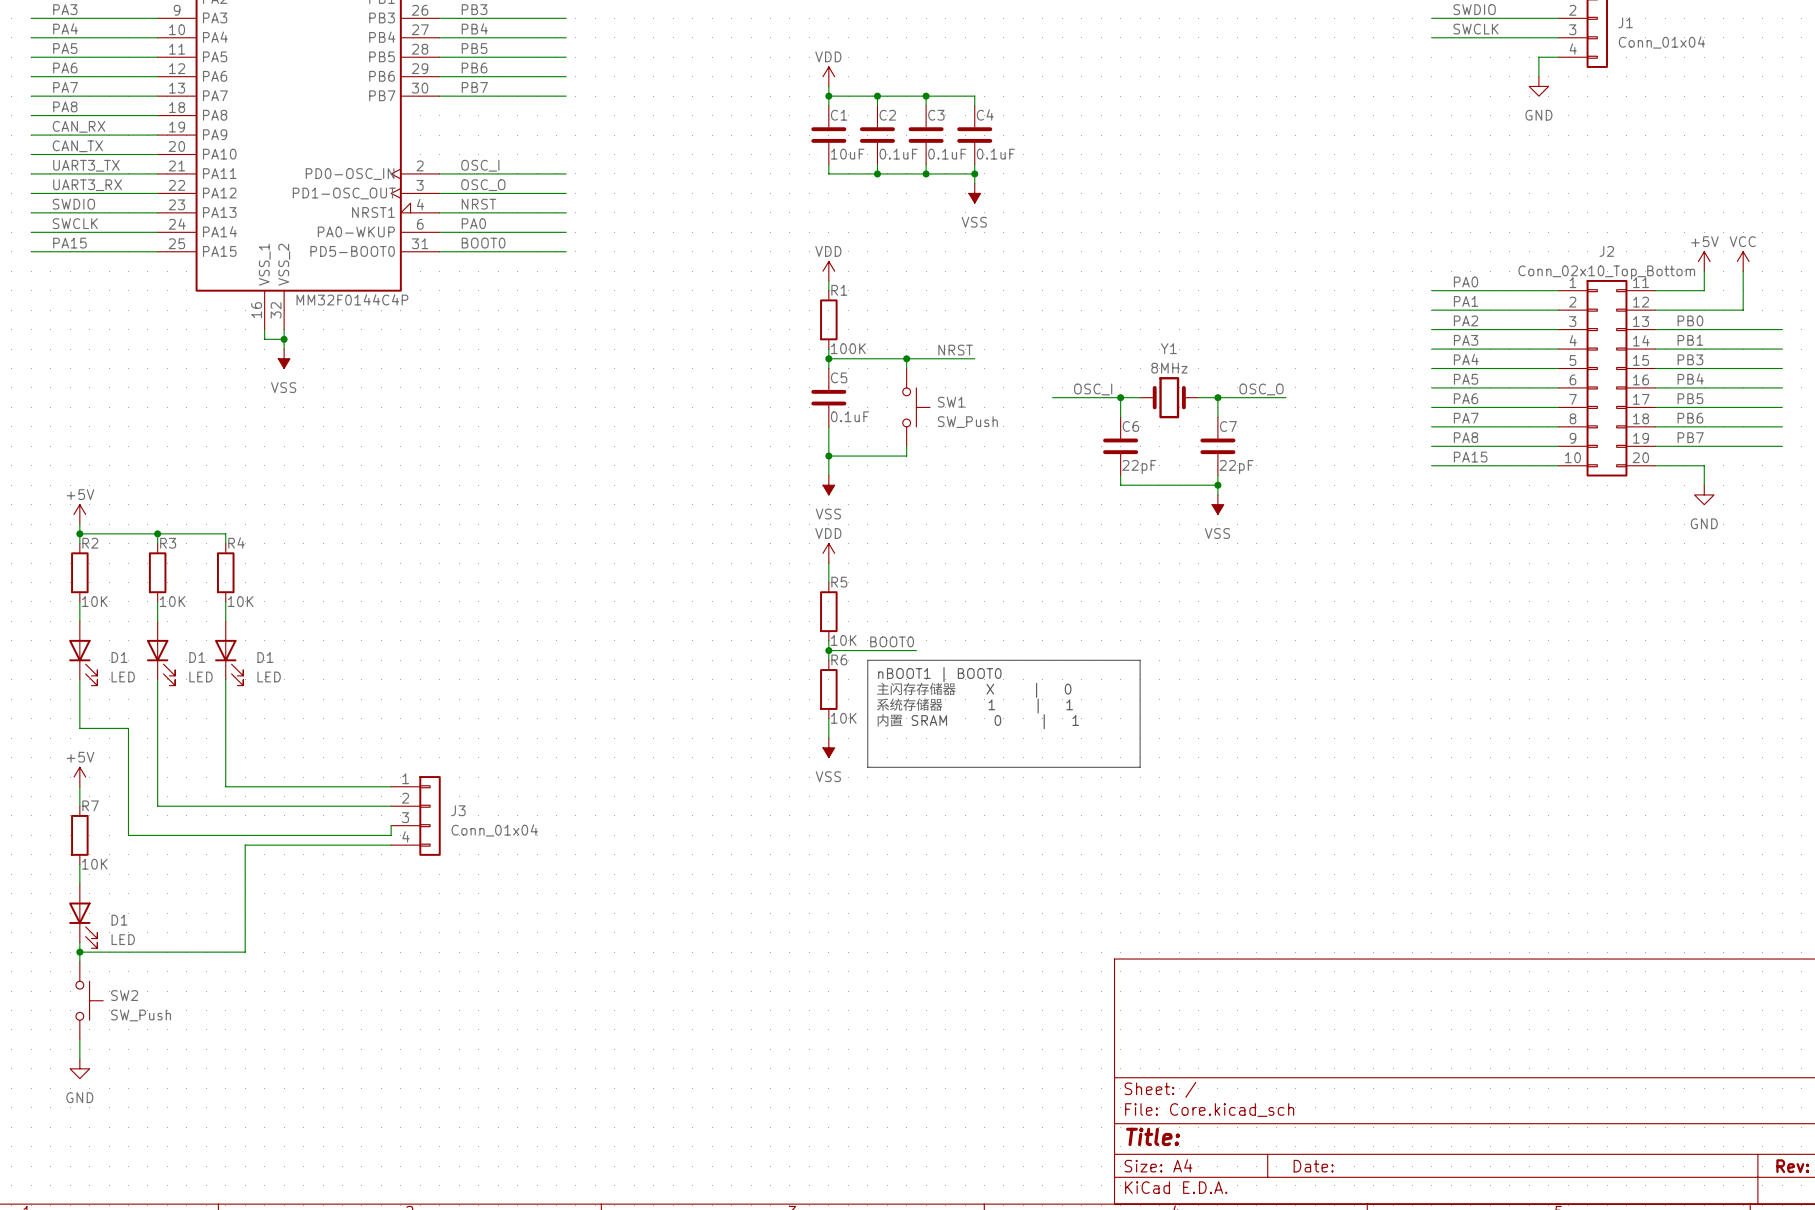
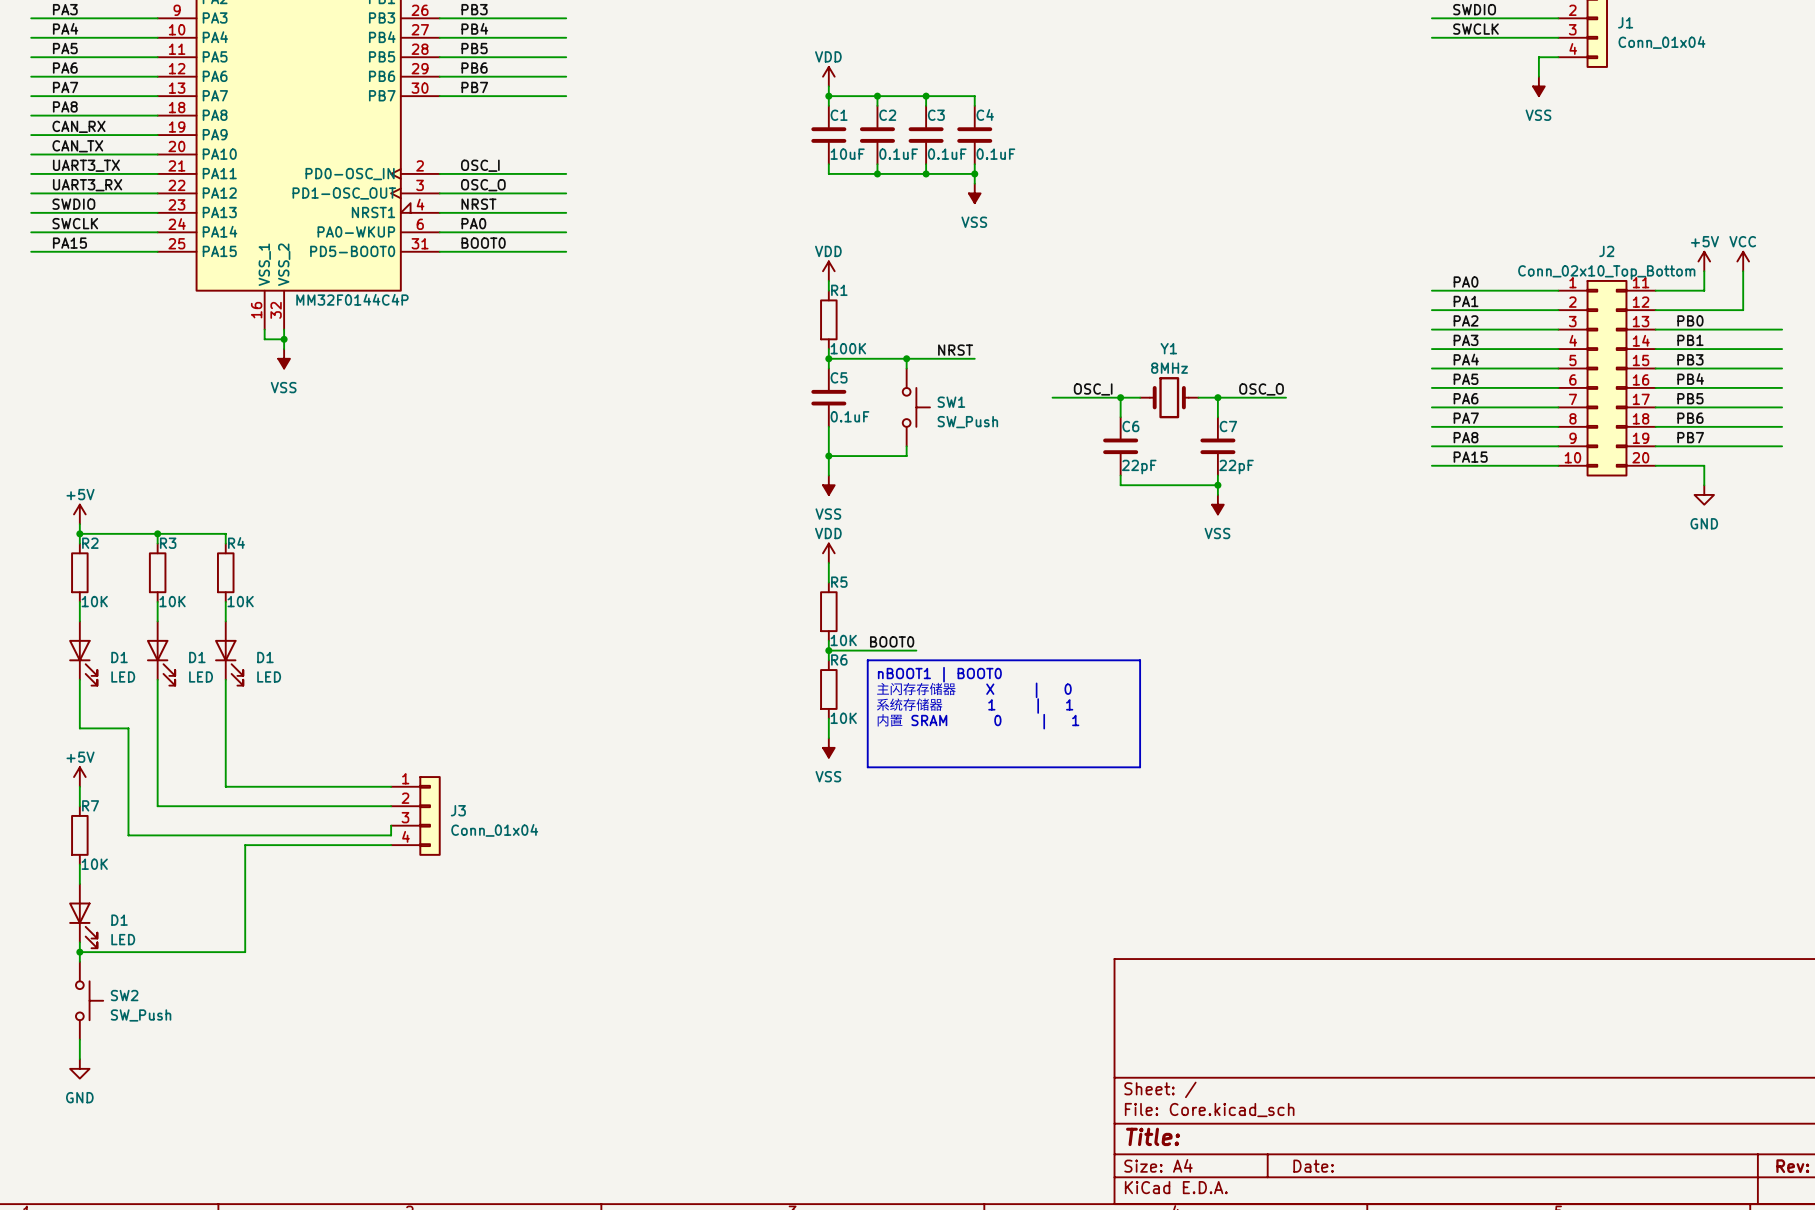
power symbol: GND (1538, 86) -> VSS (1538, 86)

